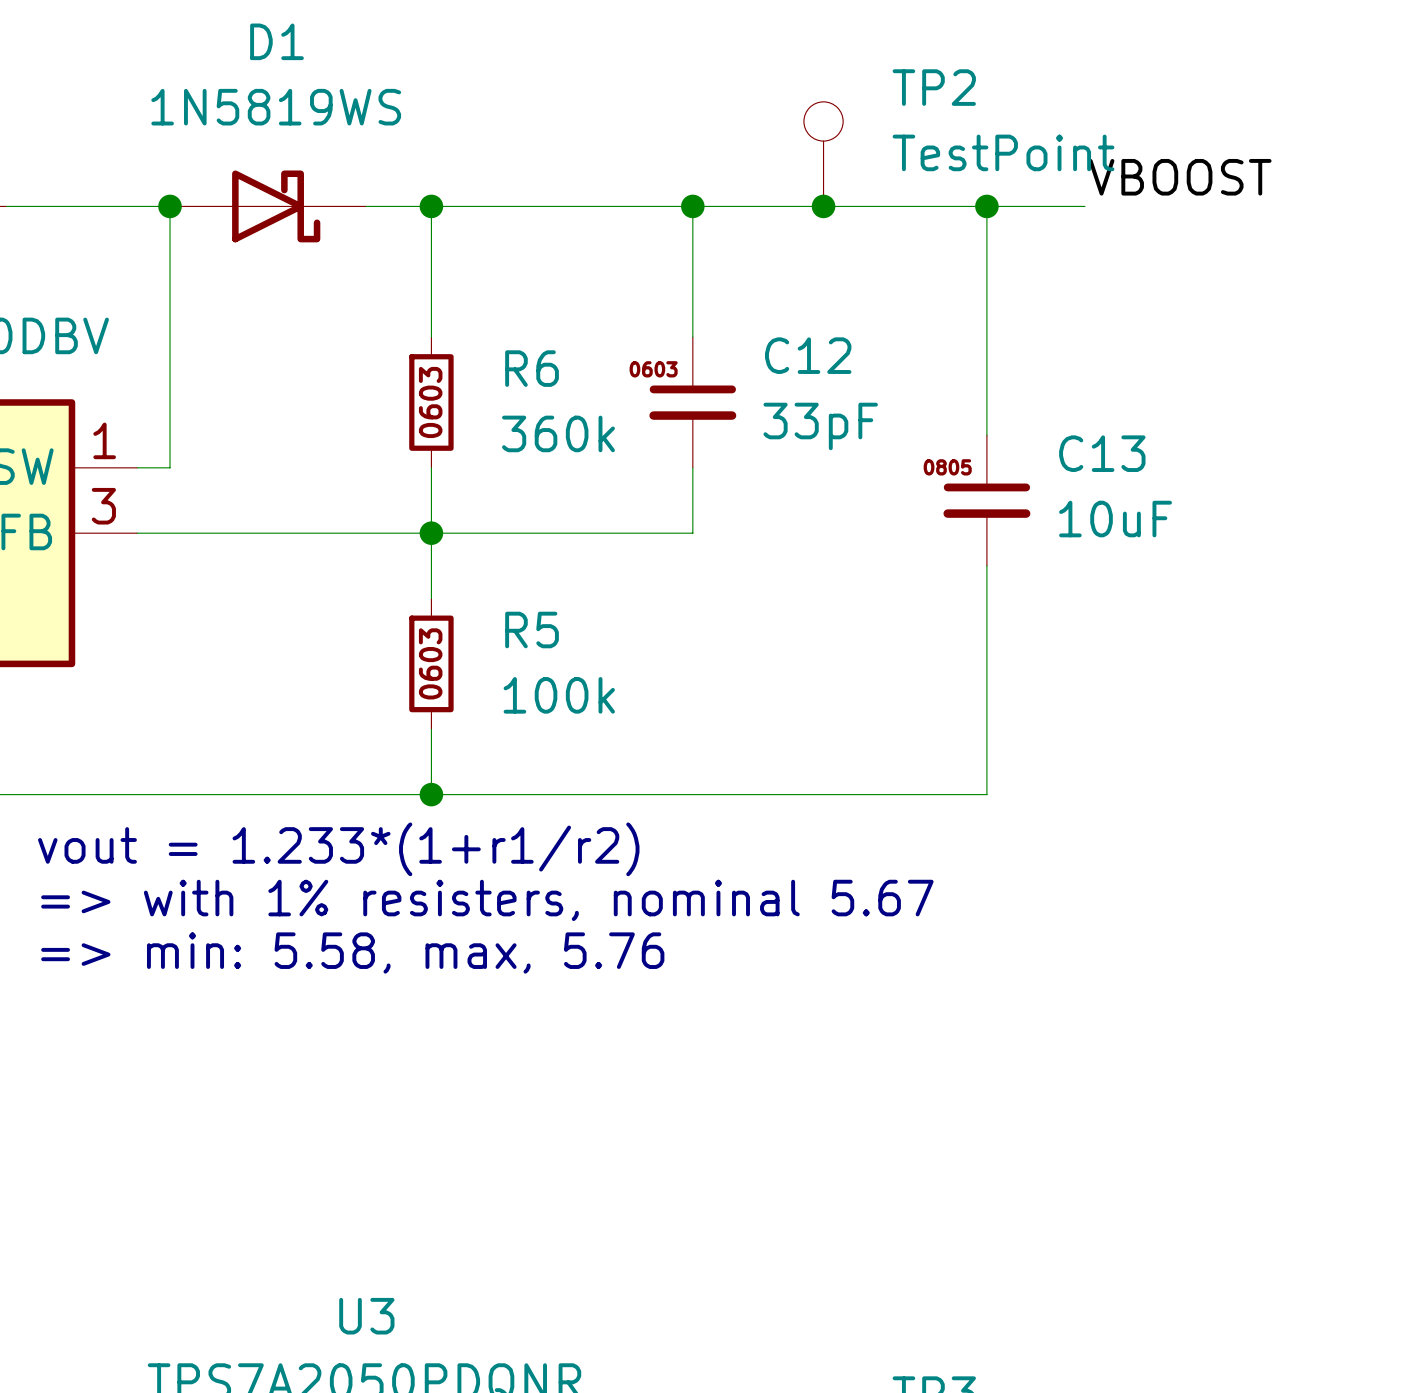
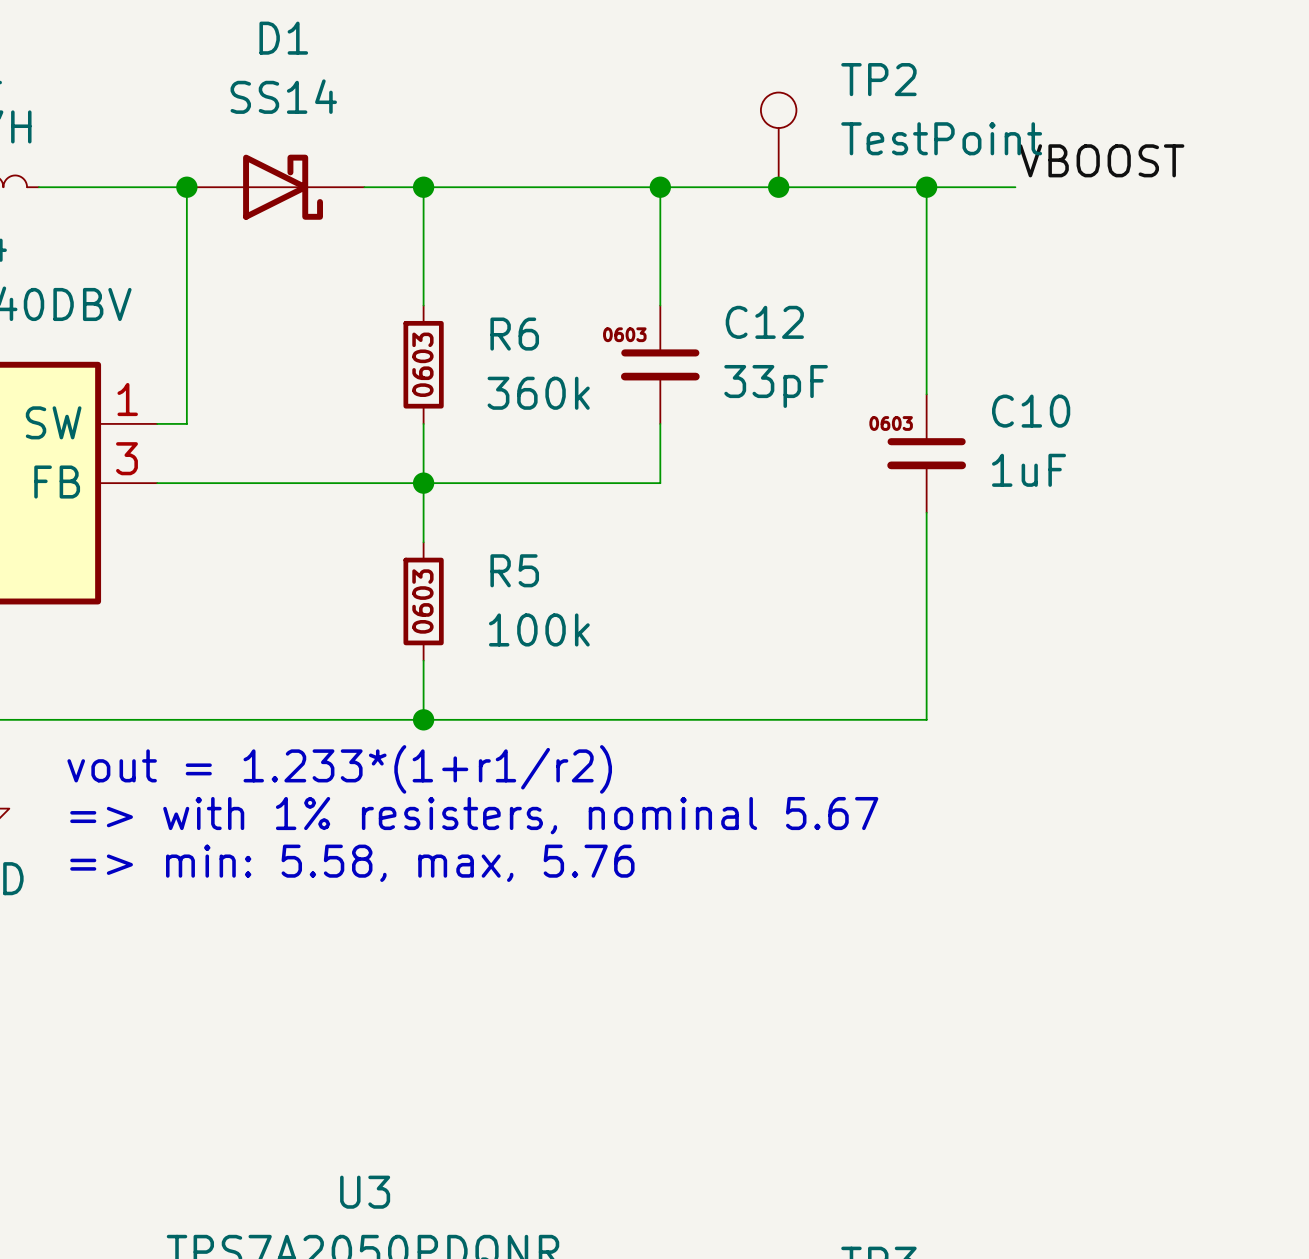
D1 value: 1N5819WS (276, 107) -> SS14 (283, 96)
C13 name: C13 (1102, 453) -> C10 (1031, 411)
C13 text: 0805 (947, 467) -> 0603 (891, 423)
C13 value: 10uF (1115, 519) -> 1uF (1029, 470)

